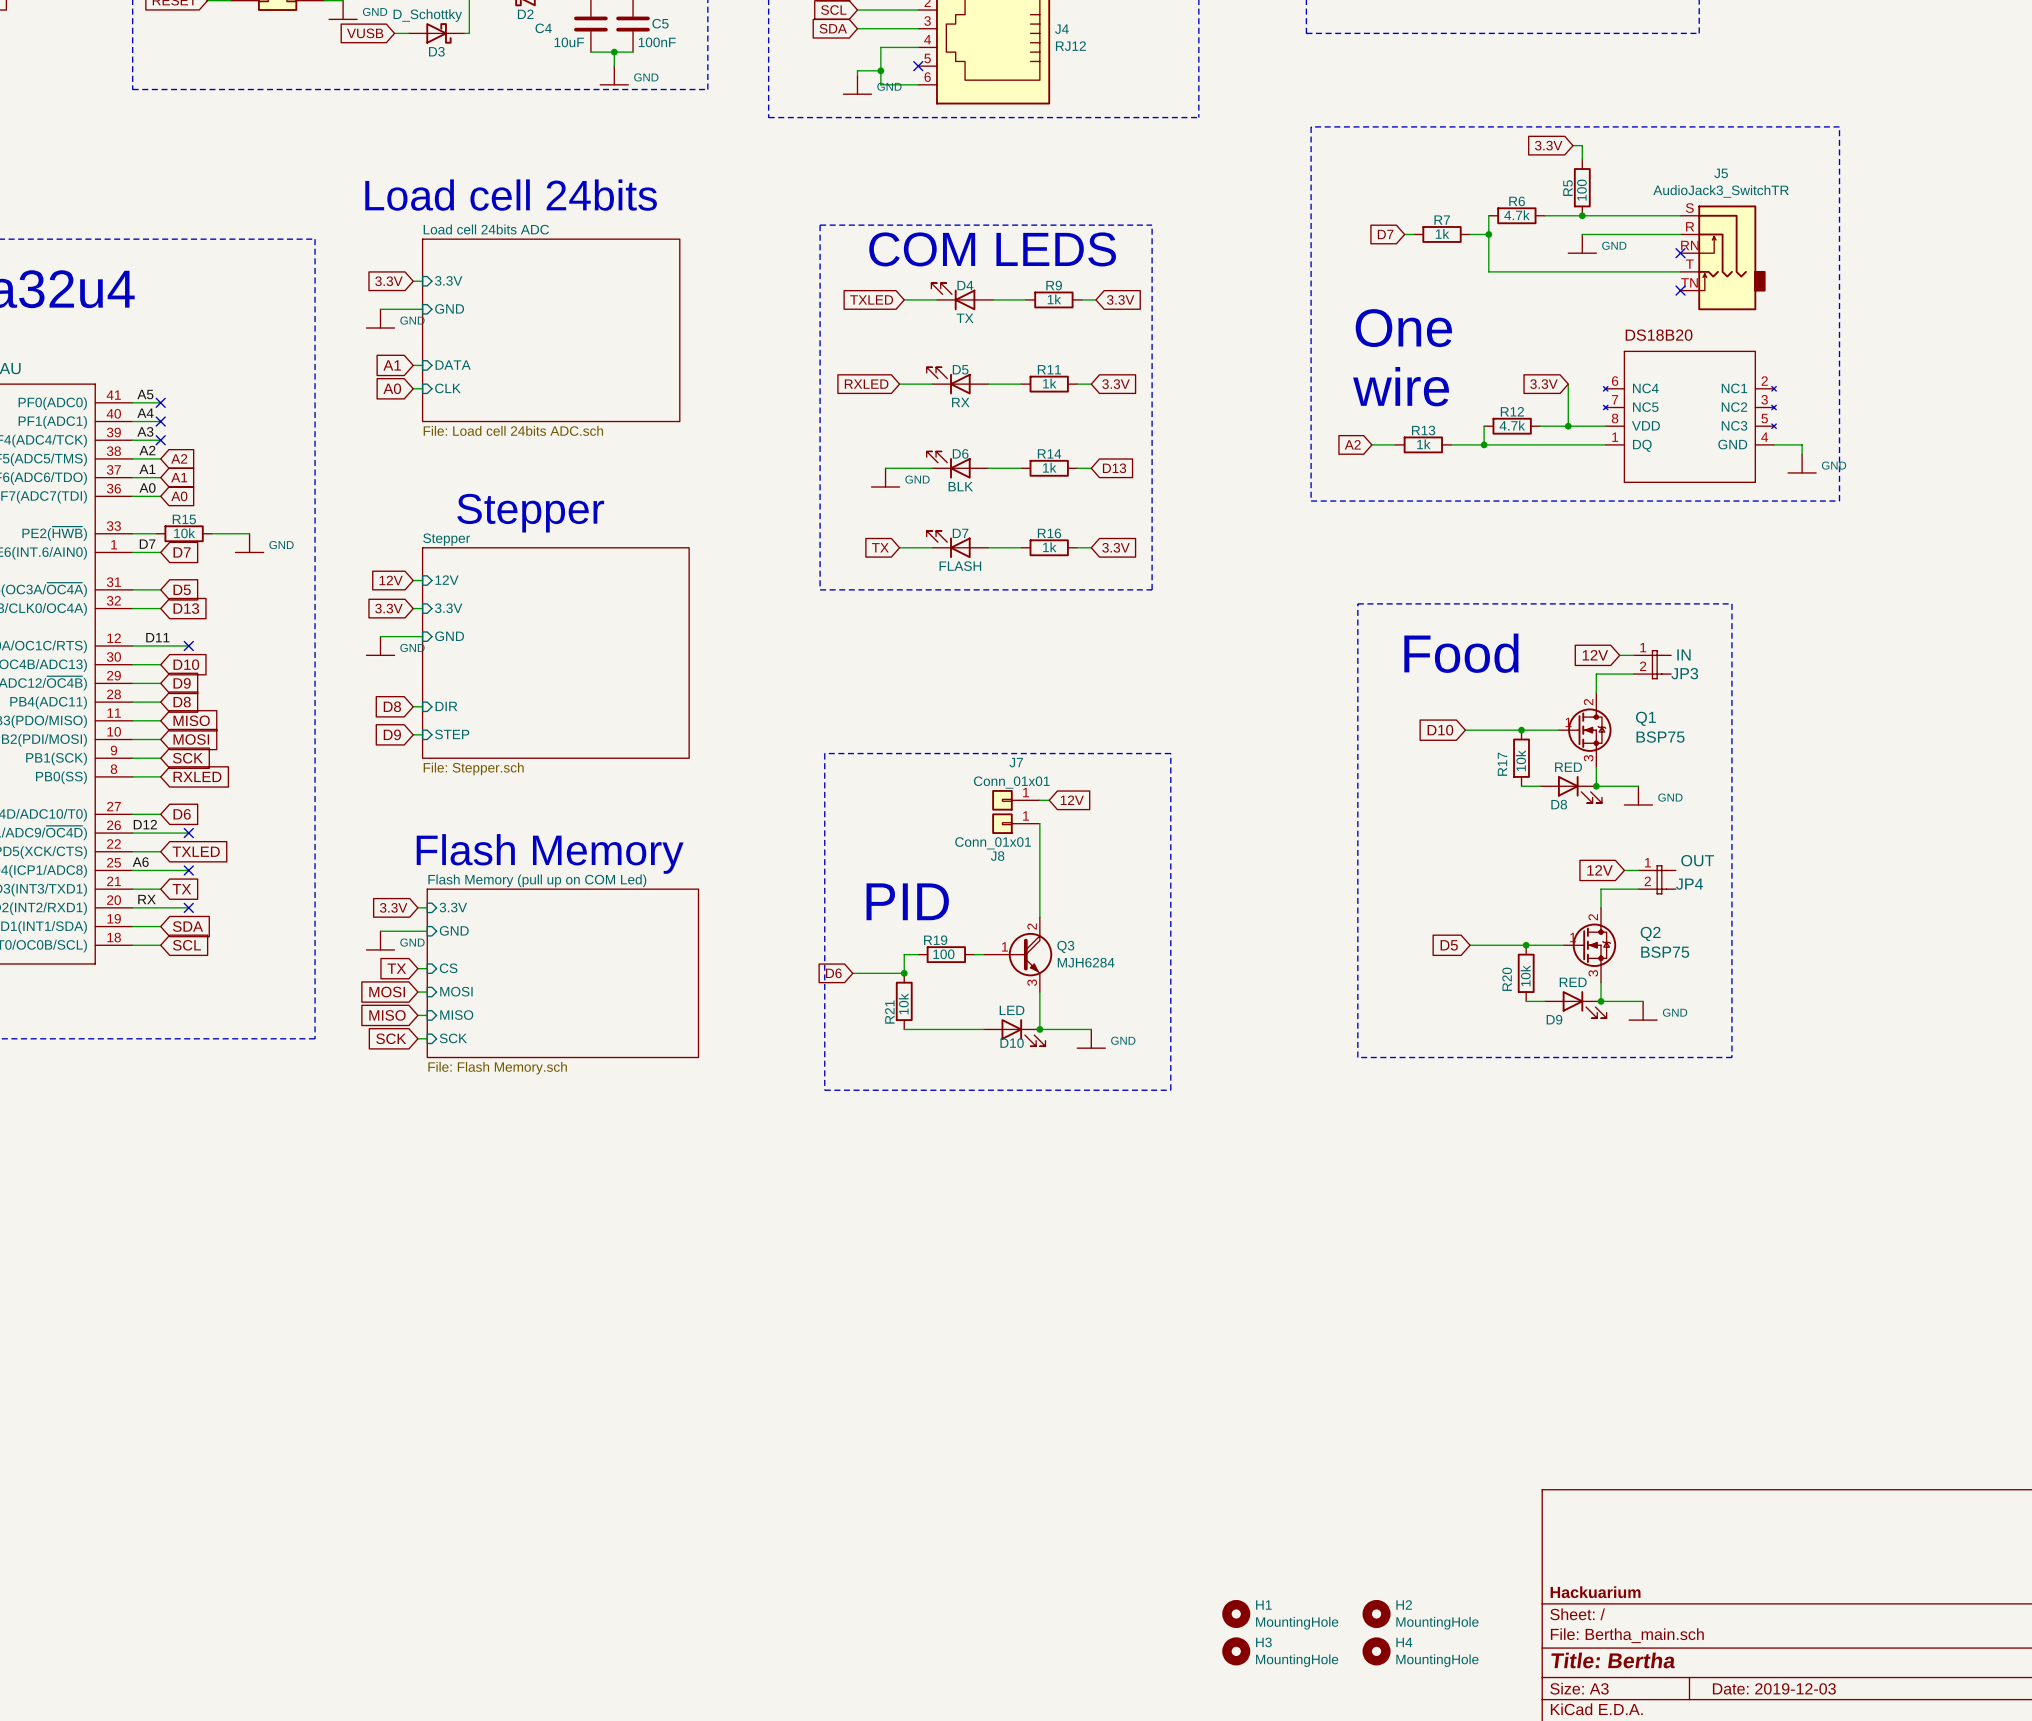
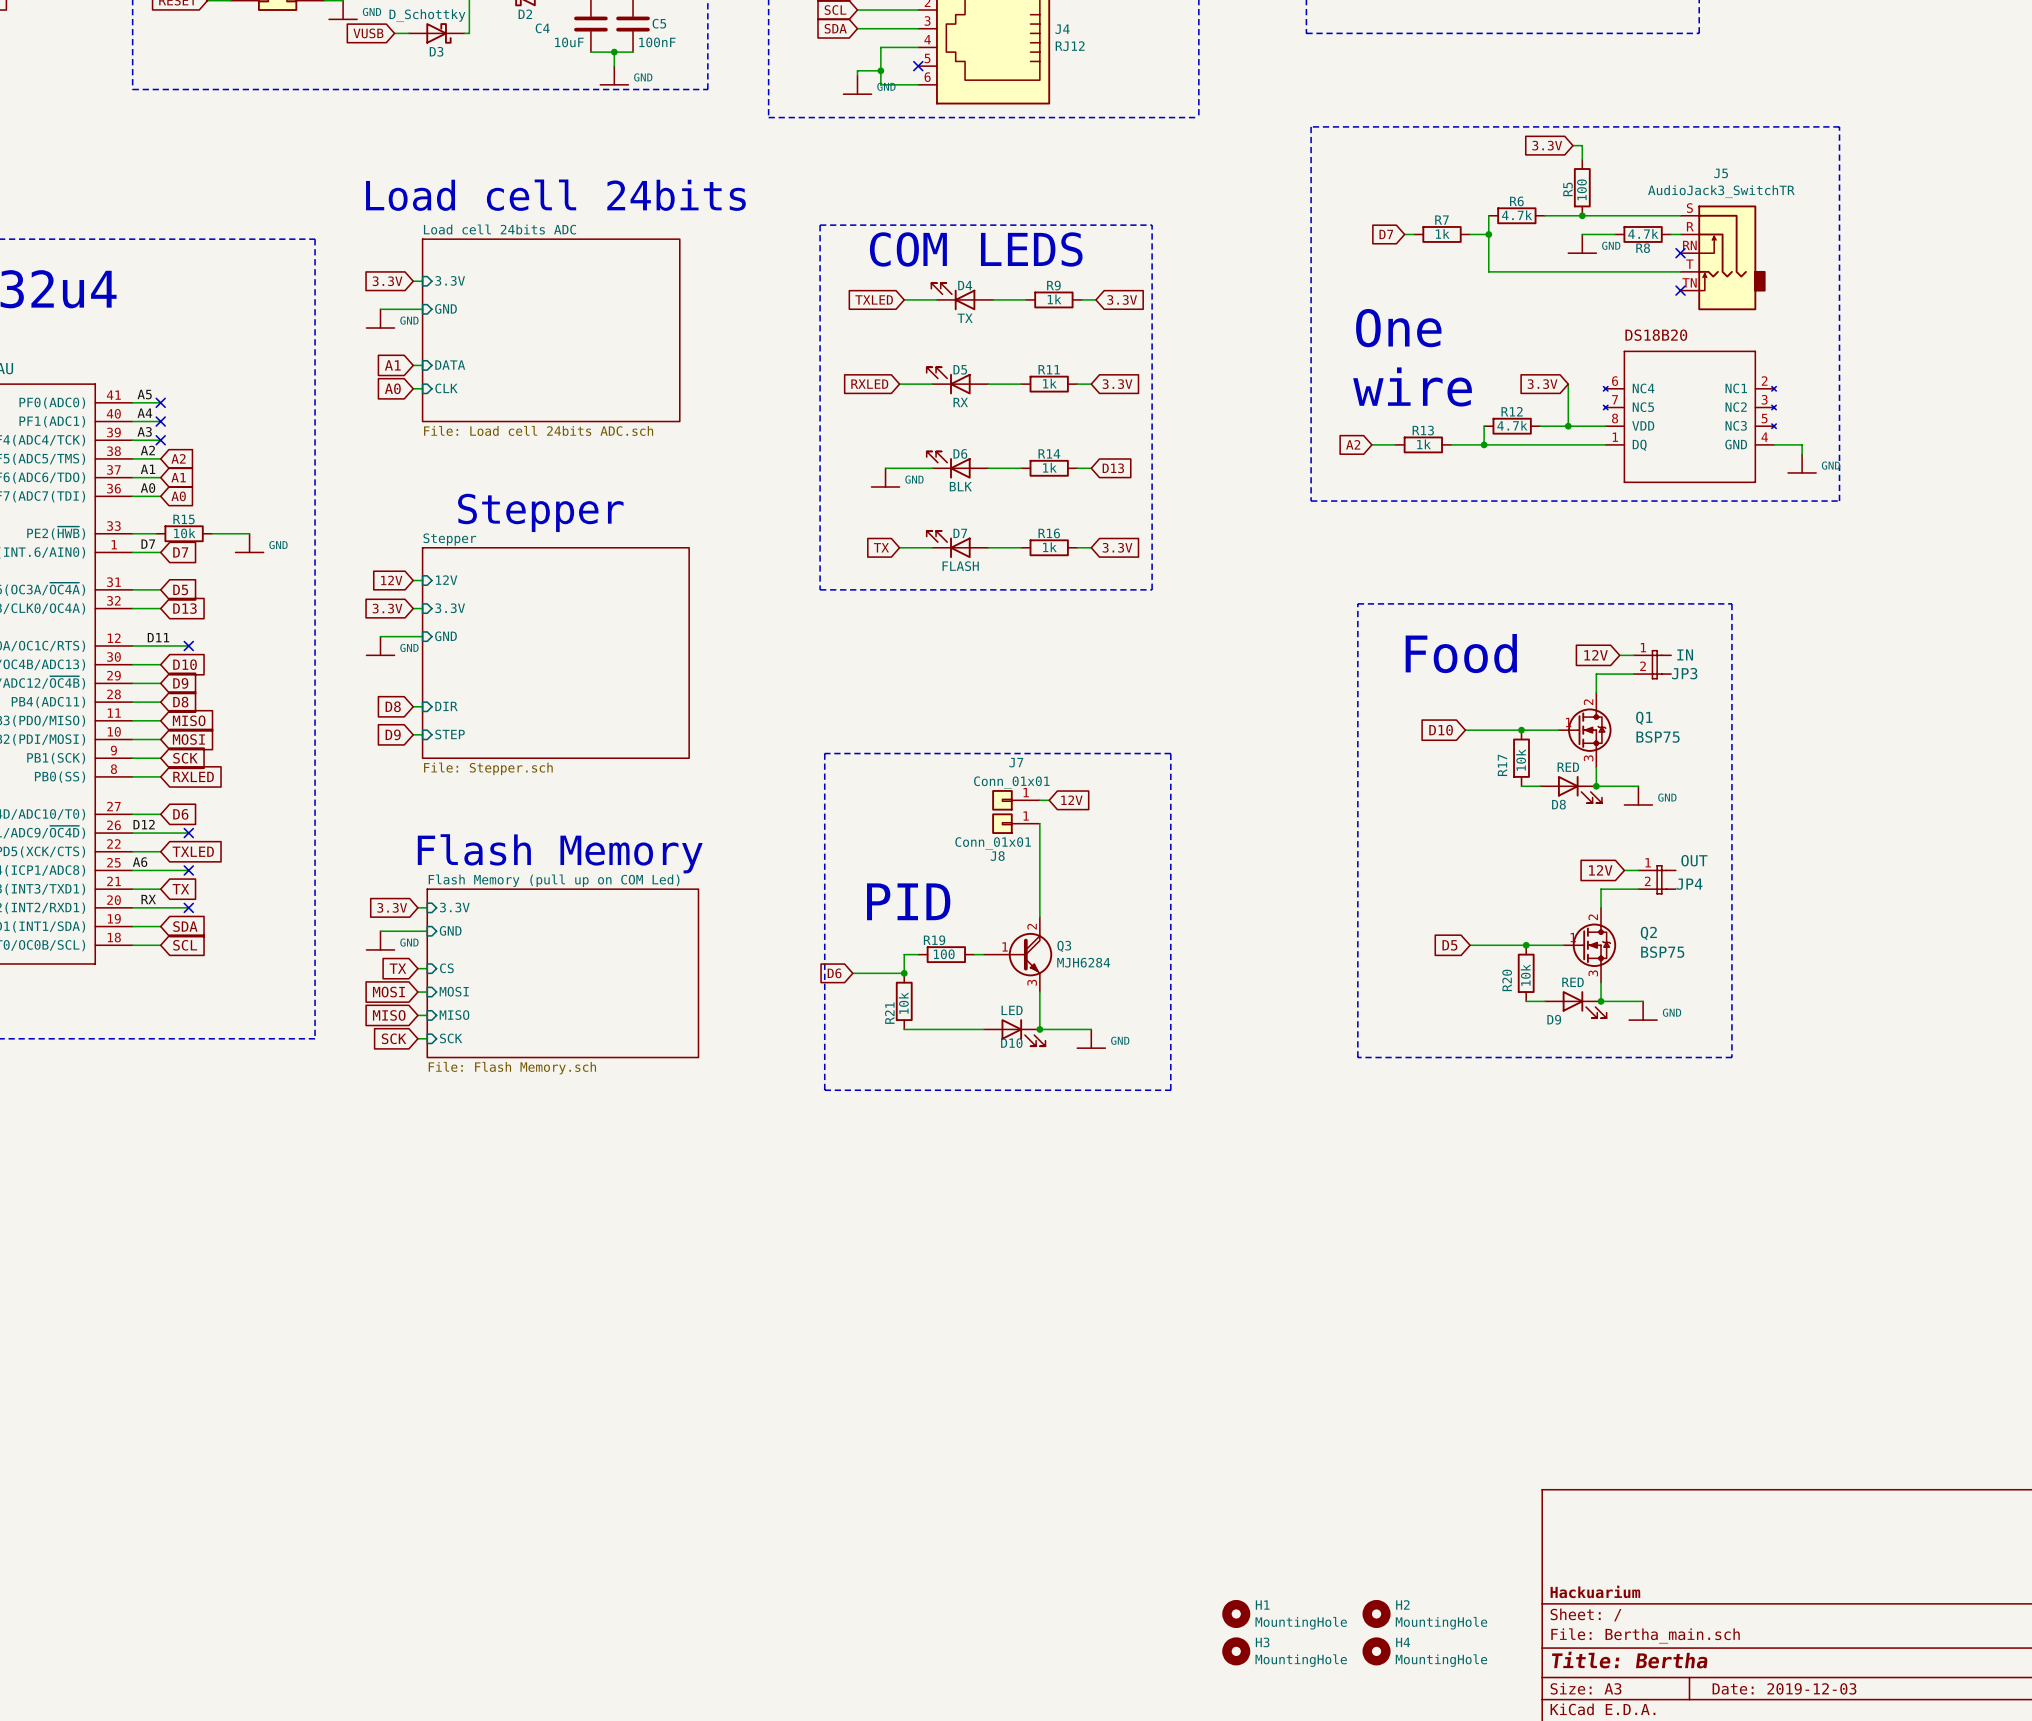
wire: (1615, 234) (1671, 234) -> none
R8: none -> 4.7k (1643, 234)

